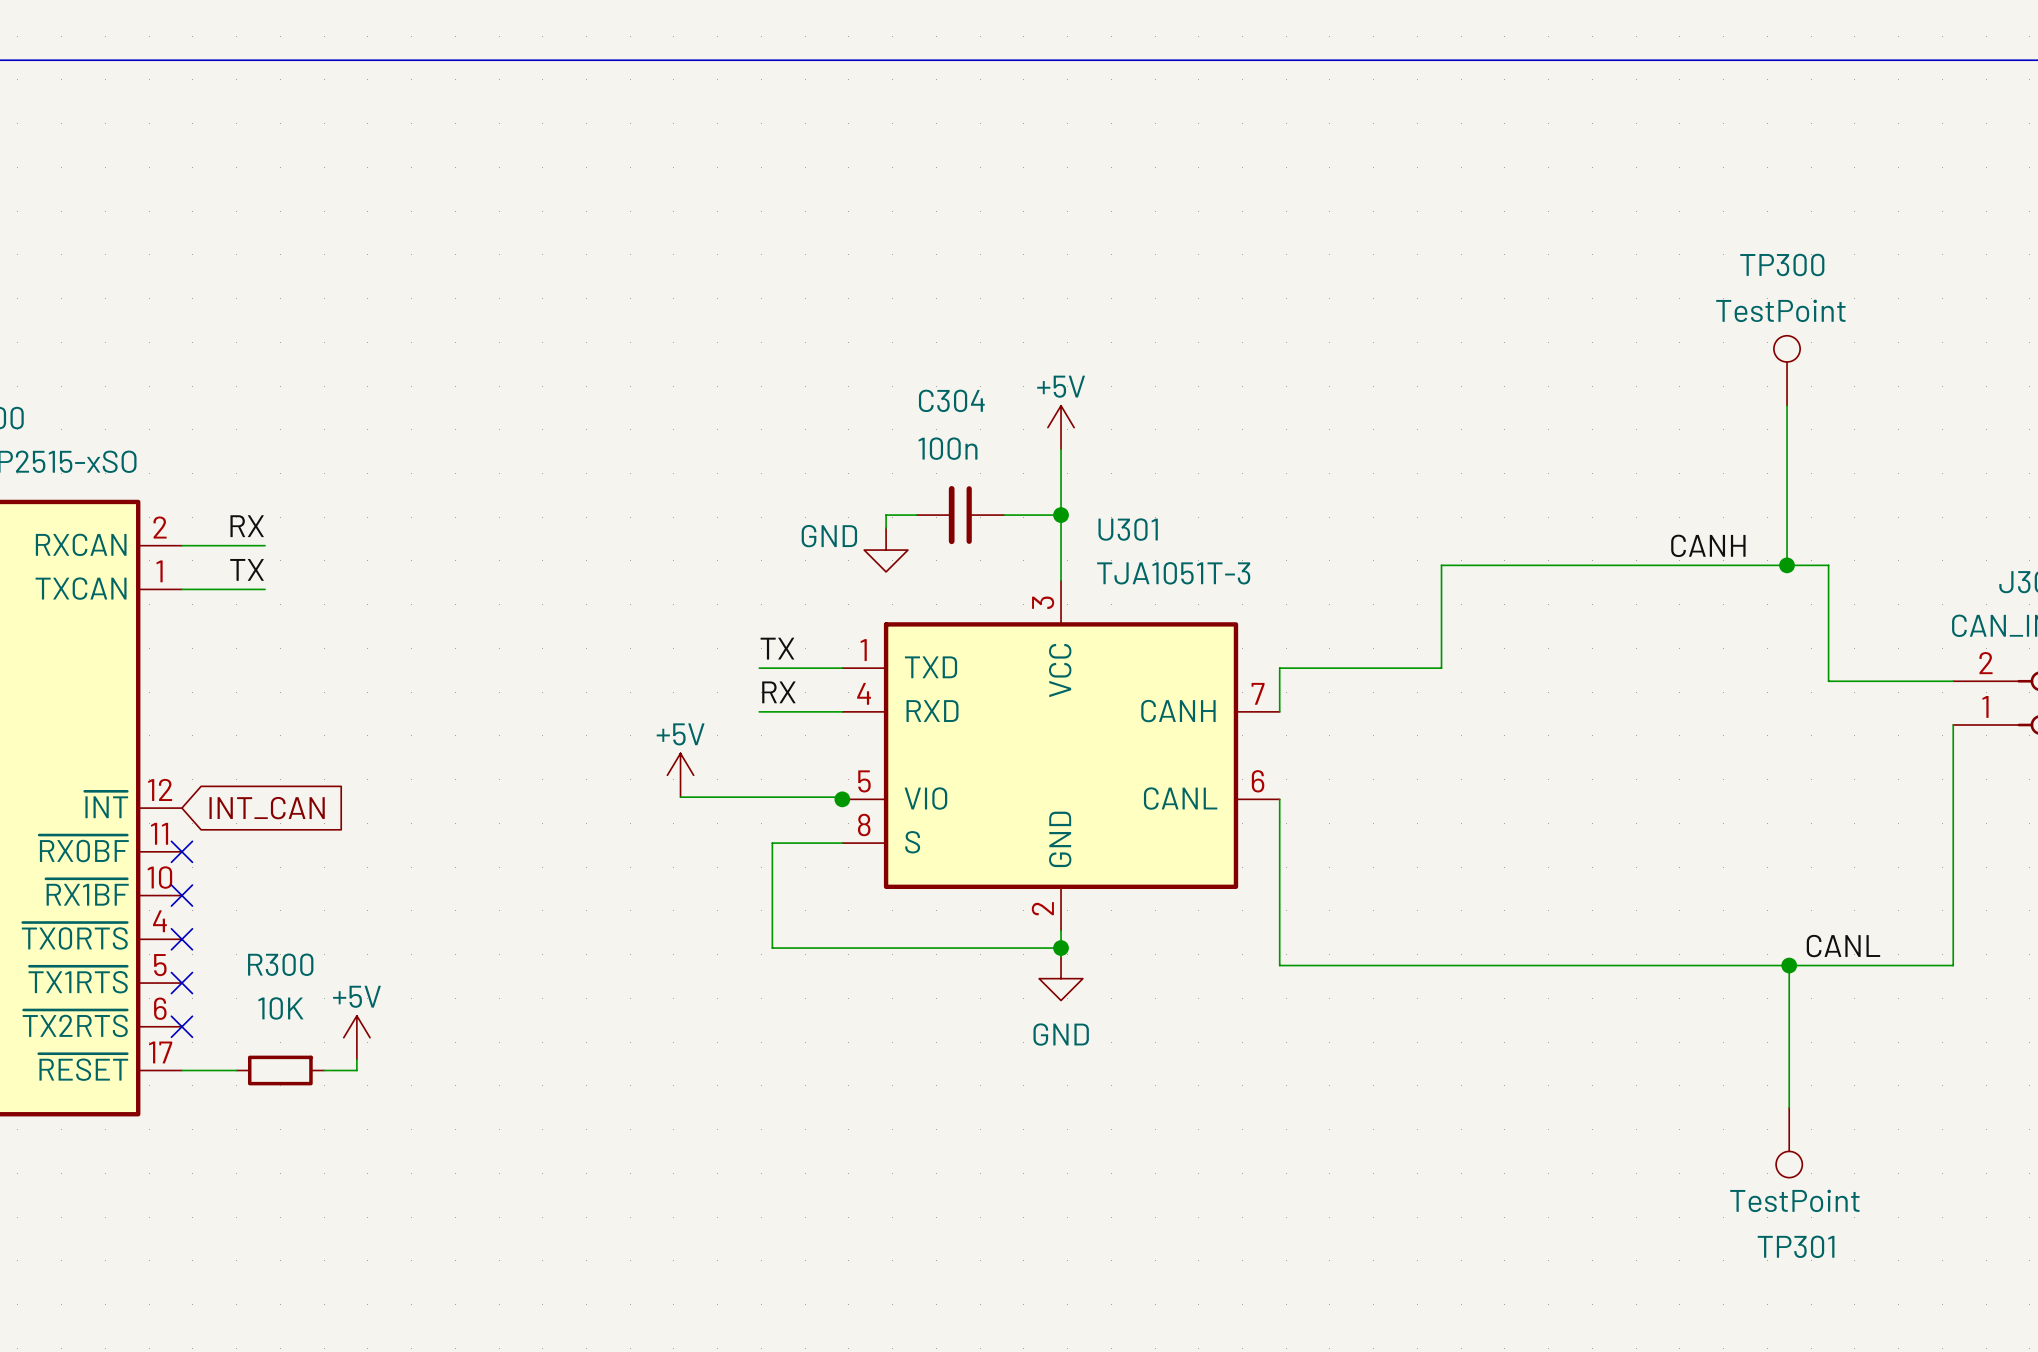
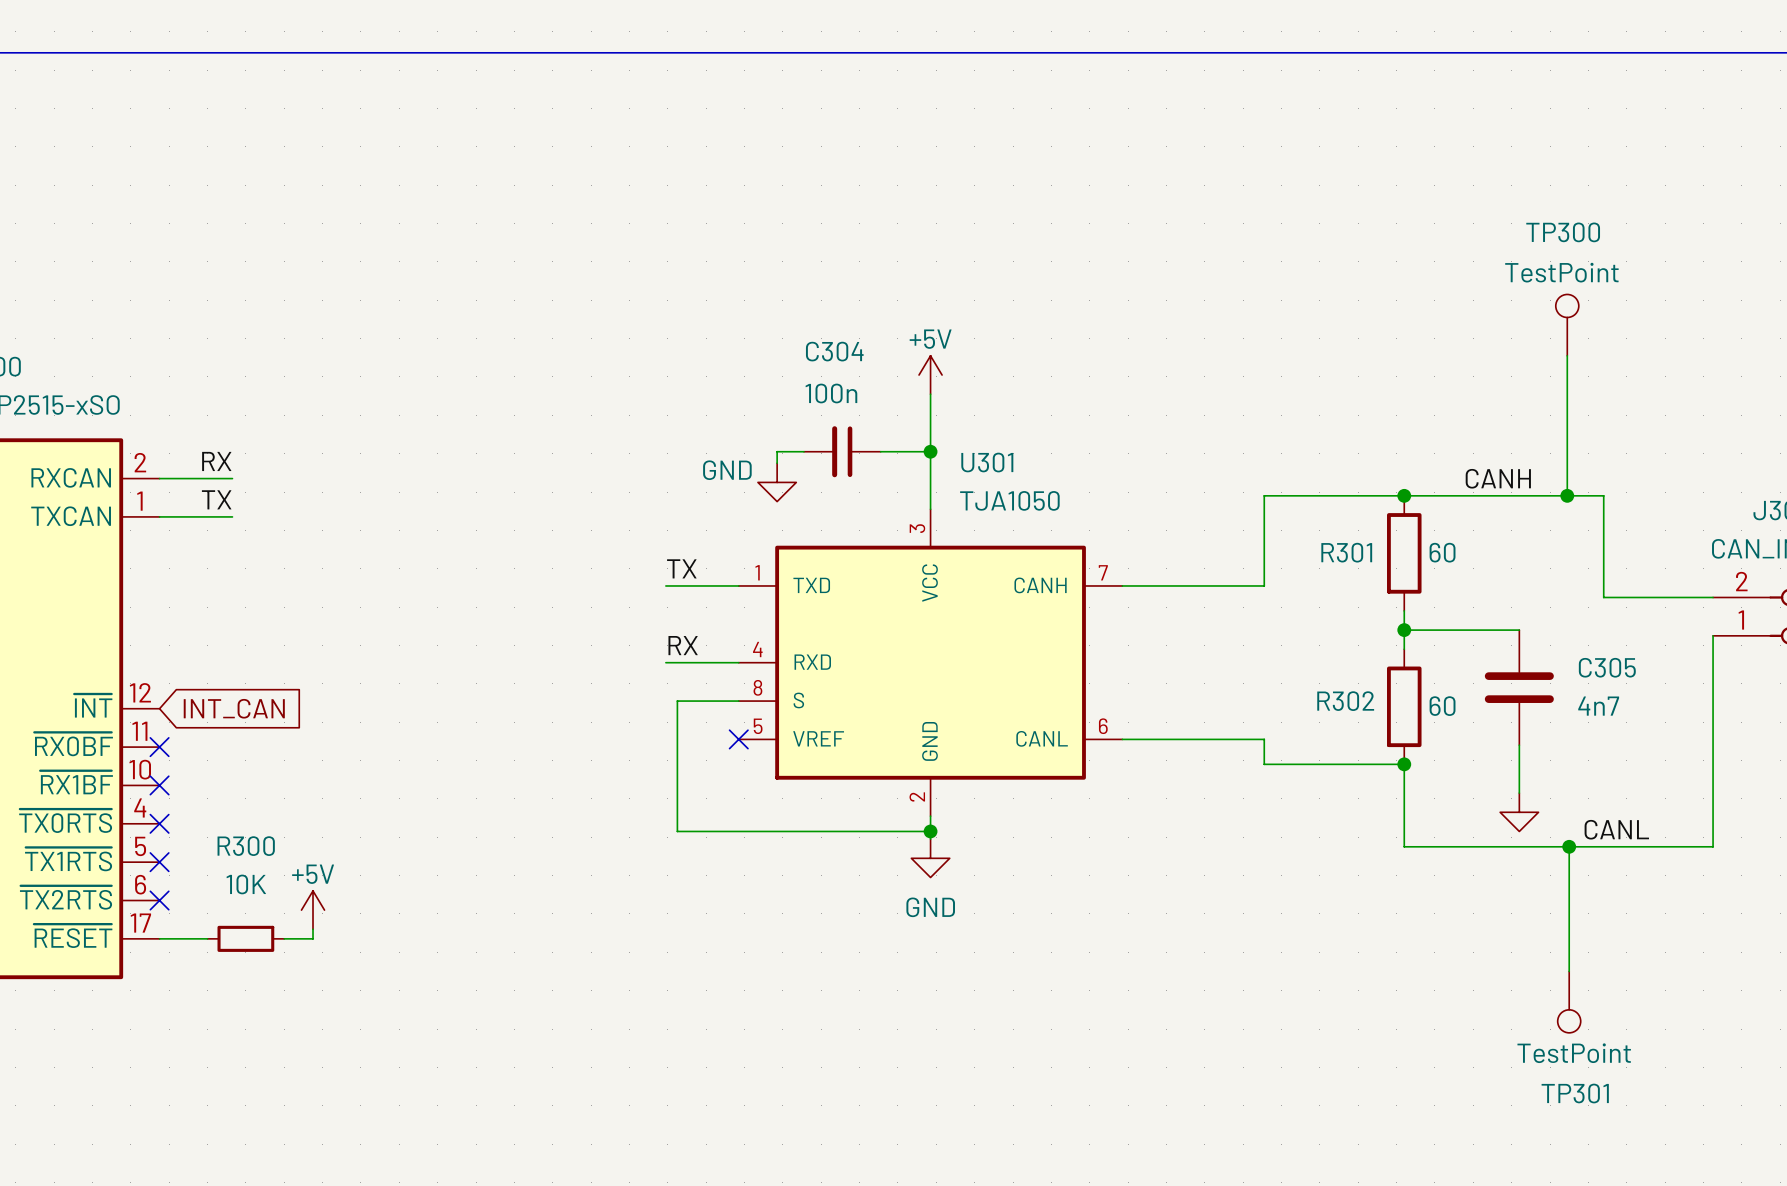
junction: none -> (1404, 495)
U301 value: TJA1051T-3 (1173, 573) -> TJA1050 (1009, 500)
U301 symbol: [842, 580, 1280, 931] -> [738, 509, 1123, 817]
R301: none -> 60 (1404, 553)
wire: (1279, 668) (1279, 711) -> (1404, 610) (1404, 649)
label position: RX (778, 692) -> RX (683, 645)
wire: (759, 711) (842, 711) -> (665, 662) (738, 662)
wire: none -> (1404, 630) (1519, 630)
junction: none -> (1404, 630)
power symbol: +5V (680, 775) -> none
C305: none -> 4n7 (1519, 687)
wire: (680, 797) (842, 797) (842, 799) -> none
junction: (842, 799) -> none
wire: (1279, 799) (1279, 965) (1601, 965) -> (1122, 739) (1264, 739) (1264, 764) (1404, 764) (1404, 846)
R302: none -> 60 (1404, 706)
wire: (772, 843) (842, 843) -> (677, 739) (677, 701) (738, 701)
no-connect mark: none -> (738, 739)
wire: none -> (1519, 745) (1519, 793)
junction: none -> (1404, 764)
power symbol: none -> (1519, 812)

